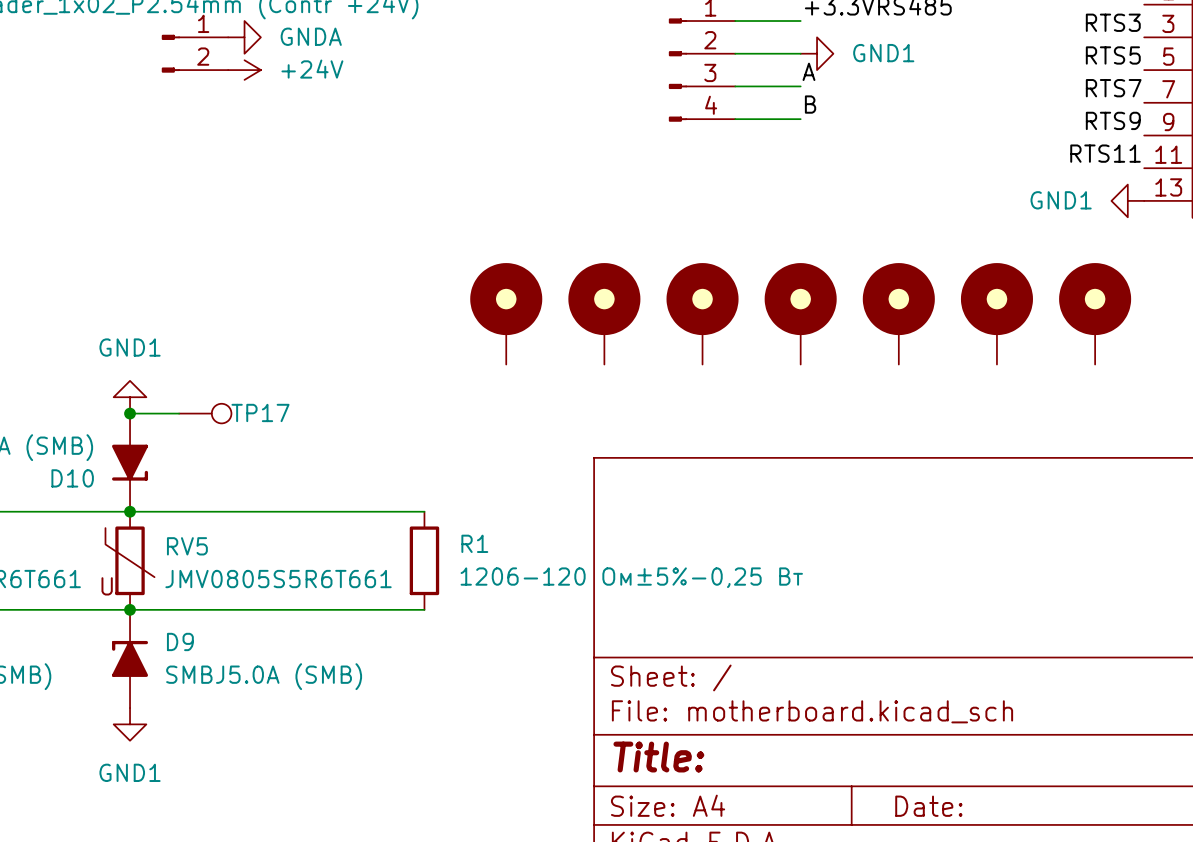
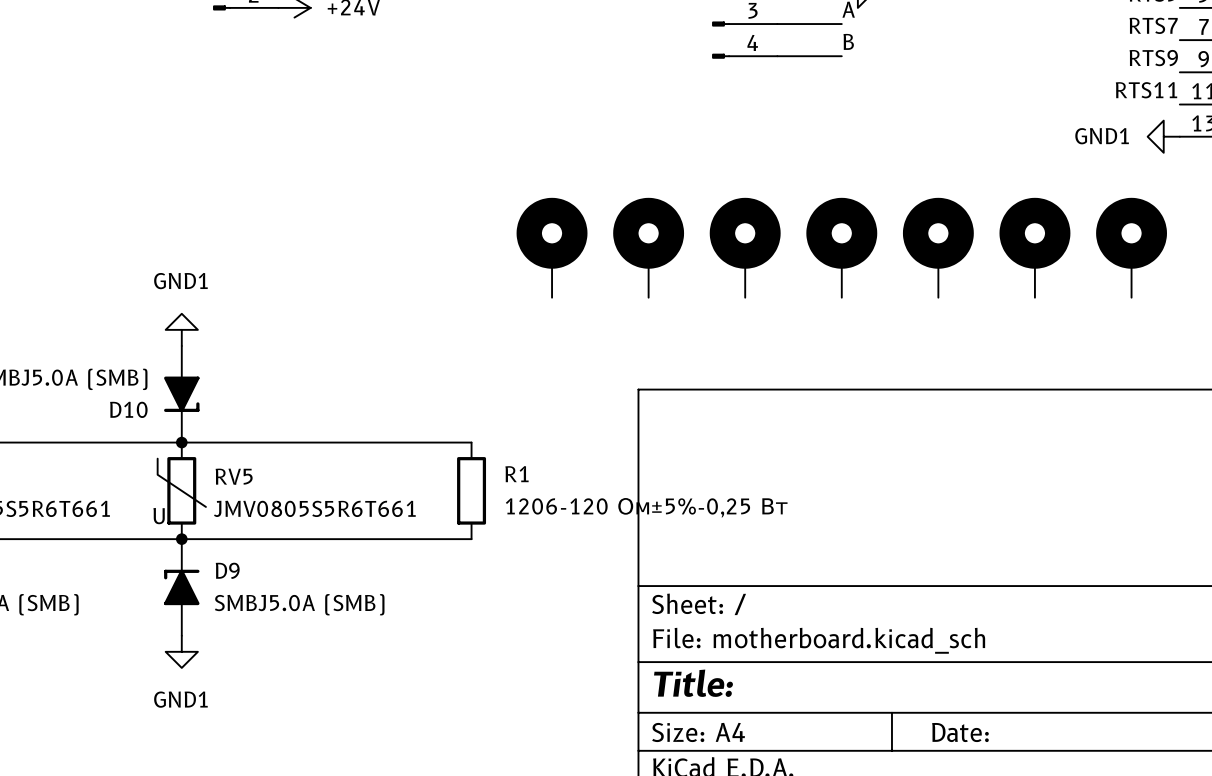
wire: (130, 413) (179, 413) -> none
junction: (130, 413) -> none
TP17: (205, 413) -> none

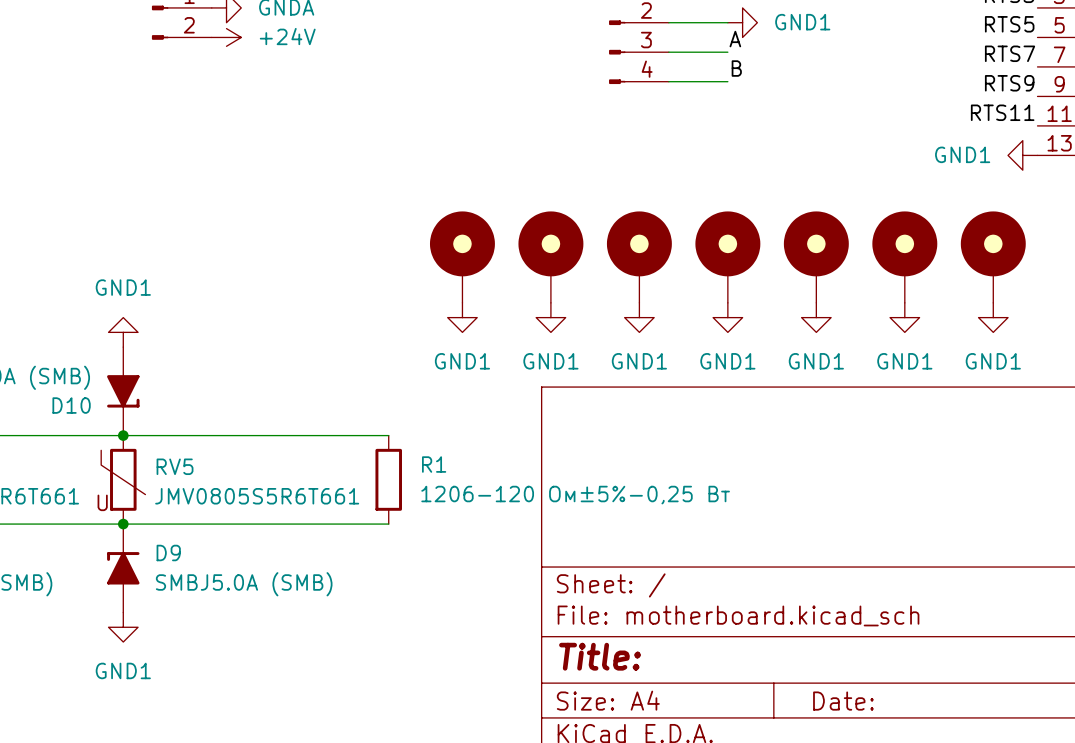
power symbol: none -> GND1 (462, 317)
power symbol: none -> GND1 (550, 317)
power symbol: none -> GND1 (639, 317)
power symbol: none -> GND1 (727, 317)
power symbol: none -> GND1 (816, 317)
power symbol: none -> GND1 (904, 317)
power symbol: none -> GND1 (993, 317)

